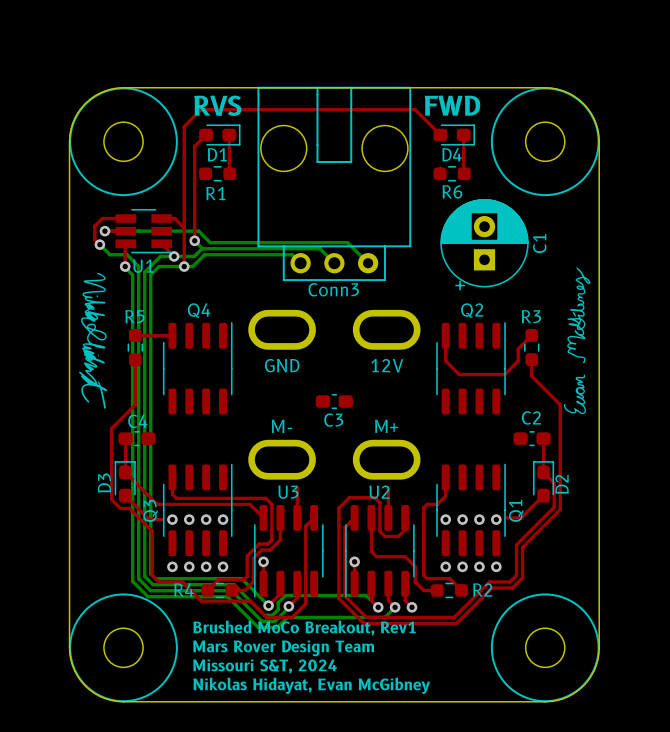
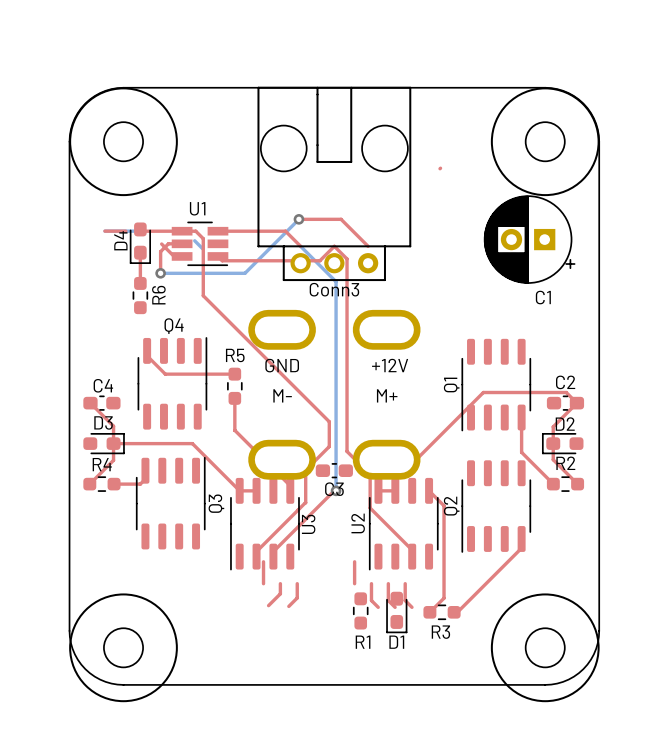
text: RVS (217, 105) -> none
text: FWD (452, 105) -> none
top track: (206, 134) (194, 146) (194, 240) -> none
D1 rotation: 0° (219, 134) -> 90° clockwise (396, 612)
D1 position: (219, 134) -> (396, 612)
top track: (229, 134) (229, 173) -> none
top track: (440, 134) (415, 109) (201, 109) (184, 126) (184, 266) -> none
D4 rotation: 0° (454, 134) -> 90° clockwise (140, 243)
D4 position: (454, 134) -> (140, 243)
top track: (463, 134) (464, 173) -> none
R1 rotation: 0° (217, 173) -> 90° clockwise (360, 610)
R1 position: (217, 173) -> (360, 610)
R6 rotation: 0° (452, 173) -> 90° clockwise (140, 295)
R6 position: (452, 173) -> (140, 295)
R6 name position: R6 (452, 191) -> R6 (158, 295)
top track: (125, 218) (102, 218) (94, 226) (94, 239) (99, 244) -> none
top track: (161, 218) (174, 218) (184, 228) -> none
top track: none -> (298, 219) (341, 219) (368, 246)
bottom track: none -> (298, 219) (244, 273) (160, 273)
via: none -> (298, 219)
top track: none -> (140, 229) (142, 231) (195, 231) (203, 238) (203, 295) (329, 421) (329, 446) (305, 470) (305, 502) (256, 551) (256, 556)
via: (104, 231) -> none
bottom track: (138, 231) (198, 231) (210, 242) (347, 242) (368, 263) -> none
U1 position: (143, 231) -> (200, 243)
top track: none -> (217, 231) (285, 231) (300, 246)
via: (194, 240) -> none
top track: (125, 243) (125, 266) -> none
top track: none -> (182, 243) (168, 243) (160, 251) (160, 273)
C1 name position: C1 (539, 243) -> C1 (543, 297)
bottom track: (99, 244) (110, 254) (127, 254) (138, 266) (138, 578) (150, 590) (231, 590) (262, 621) (275, 621) (288, 606) -> none
via: (99, 244) -> none
C1 rotation: 0° (484, 244) -> 90° counterclockwise (529, 239)
bottom track: none -> (300, 246) (336, 281) (336, 490)
top track: none -> (140, 252) (140, 283)
via: (174, 256) -> none
top track: none -> (217, 256) (222, 260) (319, 260) (334, 246) (347, 258) (347, 451) (364, 468) (370, 468) (370, 508) (412, 550) (412, 556)
bottom track: (300, 263) (292, 254) (204, 254) (192, 266) (158, 266) (150, 274) (150, 573) (155, 578) (241, 578) (268, 605) -> none
bottom track: (334, 263) (319, 248) (202, 248) (194, 256) (160, 256) (144, 272) (144, 576) (153, 584) (233, 584) (264, 615) (272, 615) (278, 609) (278, 602) (285, 595) (366, 595) (378, 607) -> none
bottom track: (125, 266) (132, 275) (132, 581) (148, 596) (227, 596) (258, 627) (277, 627) (287, 617) (384, 617) (395, 607) -> none
via: (125, 266) -> none
U1 name position: U1 (143, 266) -> U1 (197, 208)
via: (184, 266) -> none
drawing: [563, 267, 591, 415] -> none
drawing: [79, 273, 108, 409] -> none
via: none -> (160, 273)
Q2 name position: Q2 (472, 310) -> Q2 (451, 506)
R3 name position: R3 (531, 316) -> R3 (440, 632)
top track: (135, 335) (172, 335) -> none
top track: (531, 335) (518, 348) (518, 361) (504, 374) (459, 374) (445, 361) (445, 335) -> none
R5 position: (135, 347) -> (234, 386)
R3 rotation: 0° (531, 347) -> 90° clockwise (442, 612)
R3 position: (531, 347) -> (442, 612)
top track: none -> (147, 350) (147, 355) (165, 374) (234, 374) (230, 378)
top track: (135, 359) (135, 404) (111, 428) (111, 499) (120, 508) (129, 508) (152, 531) (152, 575) (158, 582) (182, 582) (197, 596) -> none
top track: (531, 359) (531, 376) (560, 404) (560, 509) (522, 547) (522, 577) (512, 588) (492, 588) (456, 623) (363, 623) (338, 598) (338, 508) (349, 497) (374, 497) (379, 502) (379, 531) (384, 536) (398, 536) (405, 529) (405, 517) -> none
text: 12V (387, 365) -> +12V (390, 365)
Q4 position: (197, 368) -> (172, 383)
Q2 rotation: 0° (471, 368) -> 180° (496, 506)
Q2 position: (471, 368) -> (496, 506)
top track: none -> (234, 398) (234, 430) (290, 485) (290, 490)
C3 position: (334, 401) -> (334, 470)
top track: none -> (90, 403) (113, 426) (113, 460) (89, 484)
text position: M- (281, 426) -> M- (282, 395)
text position: M+ (386, 426) -> M+ (387, 395)
top track: none -> (521, 426) (521, 452) (553, 484)
top track: (125, 438) (125, 472) (157, 504) (249, 504) (263, 517) -> none
C4 position: (137, 438) -> (101, 403)
C2 position: (532, 438) -> (565, 403)
top track: (543, 438) (543, 472) (554, 483) (554, 507) (516, 544) (516, 575) (509, 582) (489, 582) (454, 617) (366, 617) (344, 595) (344, 527) (354, 517) (354, 523) -> none
top track: none -> (113, 443) (192, 443) (239, 490) (256, 490)
top track: none -> (147, 477) (140, 484) (114, 484)
top track: (172, 477) (172, 494) (176, 498) (265, 498) (271, 504) (271, 539) (267, 544) (259, 544) (247, 555) (247, 576) (243, 579) (218, 579) (207, 590) -> none
top track: (445, 477) (445, 495) (437, 504) (427, 504) (423, 507) (423, 575) (427, 578) (449, 578) (461, 590) -> none
D3 rotation: 0° (125, 481) -> 90° clockwise (104, 443)
D3 position: (125, 481) -> (104, 443)
D2 rotation: 0° (543, 481) -> 90° counterclockwise (562, 443)
D2 position: (543, 481) -> (562, 443)
top track: none -> (577, 484) (553, 459) (553, 426) (576, 403) (566, 392) (483, 392) (395, 480) (395, 490) (378, 490)
top track: (297, 487) (297, 517) -> none
top track: (388, 487) (388, 517) -> none
top track: none -> (336, 490) (273, 551) (273, 556)
via: none -> (336, 490)
top track: none -> (429, 490) (444, 505) (444, 598) (429, 612)
U3 name rotation: 0° (288, 492) -> 90° counterclockwise (308, 524)
U3 name position: U3 (288, 492) -> U3 (308, 524)
U2 name rotation: 0° (379, 492) -> 90° counterclockwise (358, 523)
U2 name position: U2 (379, 492) -> U2 (358, 523)
top track: (125, 495) (149, 519) (162, 519) -> none
top track: (543, 495) (521, 517) (506, 517) -> none
Q3 position: (197, 509) -> (170, 503)
Q1 rotation: 0° (471, 509) -> 180° (496, 385)
Q1 position: (471, 509) -> (496, 385)
Q3 name position: Q3 (150, 510) -> Q3 (216, 503)
top track: (280, 511) (280, 539) (270, 550) (261, 550) (253, 558) (253, 582) (244, 590) (232, 590) -> none
top track: (314, 517) (305, 526) (305, 603) (292, 617) (266, 617) (258, 609) -> none
top track: (371, 517) (371, 551) (376, 556) (405, 556) (415, 566) (415, 582) (423, 590) (437, 590) -> none
via: (172, 519) -> none
via: (189, 519) -> none
via: (206, 519) -> none
via: (223, 519) -> none
via: (445, 519) -> none
via: (462, 519) -> none
via: (479, 519) -> none
via: (496, 519) -> none
top track: none -> (521, 543) (521, 548) (457, 612) (454, 612)
U3 position: (288, 551) -> (264, 524)
U2 position: (379, 551) -> (403, 524)
via: (263, 561) -> none
via: (354, 561) -> none
via: (172, 566) -> none
via: (189, 566) -> none
via: (206, 566) -> none
via: (223, 566) -> none
via: (445, 566) -> none
via: (462, 566) -> none
via: (479, 566) -> none
via: (496, 566) -> none
R4 name position: R4 (184, 589) -> R4 (102, 464)
R2 name position: R2 (482, 589) -> R2 (565, 463)
R4 position: (219, 590) -> (101, 484)
R2 position: (449, 590) -> (565, 484)
top track: (197, 596) (201, 601) (250, 601) (258, 609) -> none
via: (268, 605) -> none
via: (288, 606) -> none
via: (378, 607) -> none
via: (395, 607) -> none
via: (411, 607) -> none
text: Brushed MoCo Breakout, Rev1 (304, 628) -> none
board edge: (69, 630) (70, 659) (81, 681) (100, 696) (123, 701) (551, 701) (573, 693) (590, 676) (597, 659) (599, 630) -> (69, 630) (74, 654) (85, 669) (100, 679) (123, 684) (551, 684) (573, 676) (587, 664) (596, 648) (599, 630)
text: Mars Rover Design Team (283, 648) -> none
text: Missouri S&T, 2024 (265, 666) -> none
text: Nikolas Hidayat, Evan McGibney (311, 685) -> none

